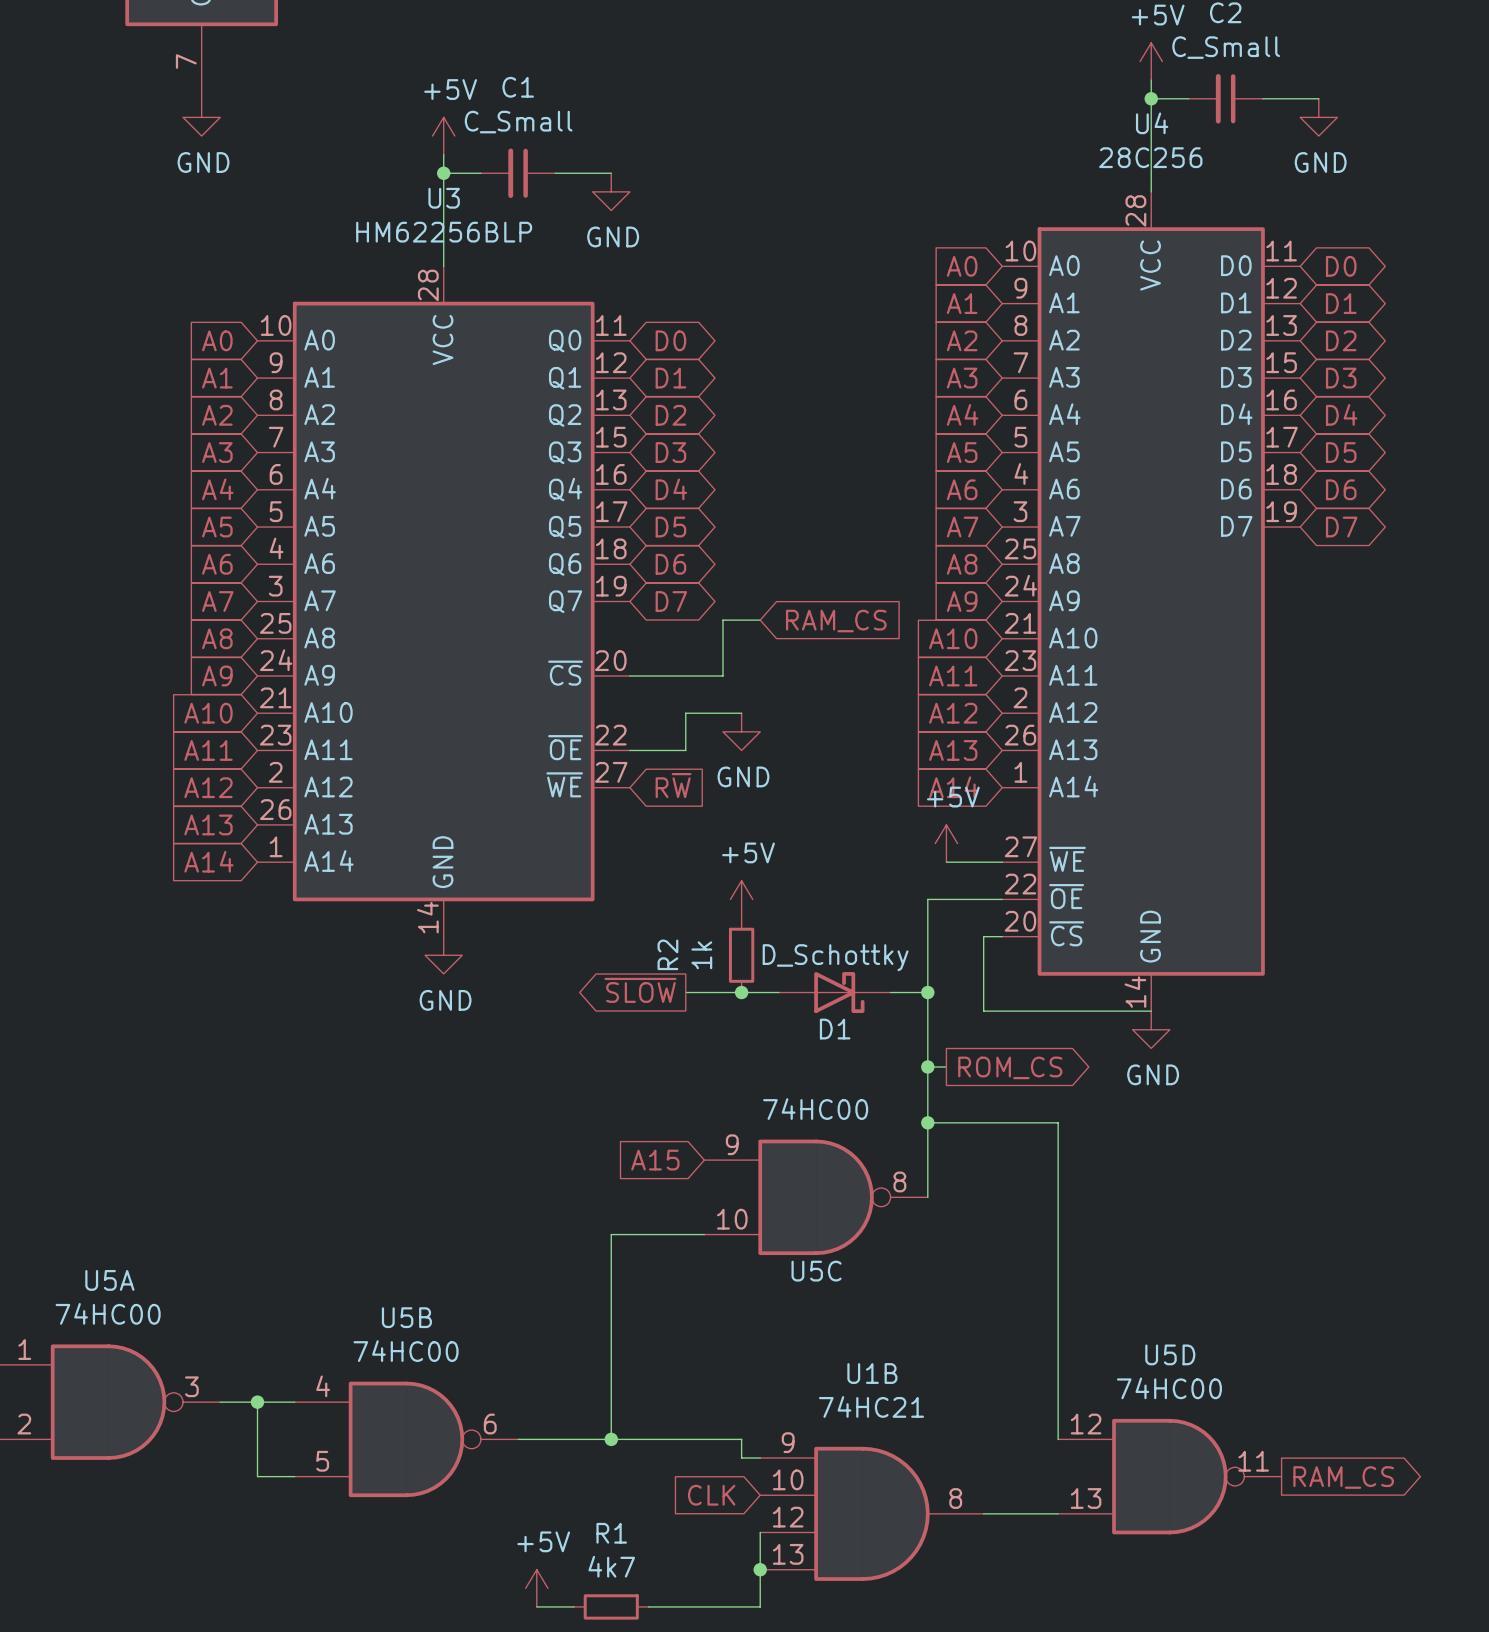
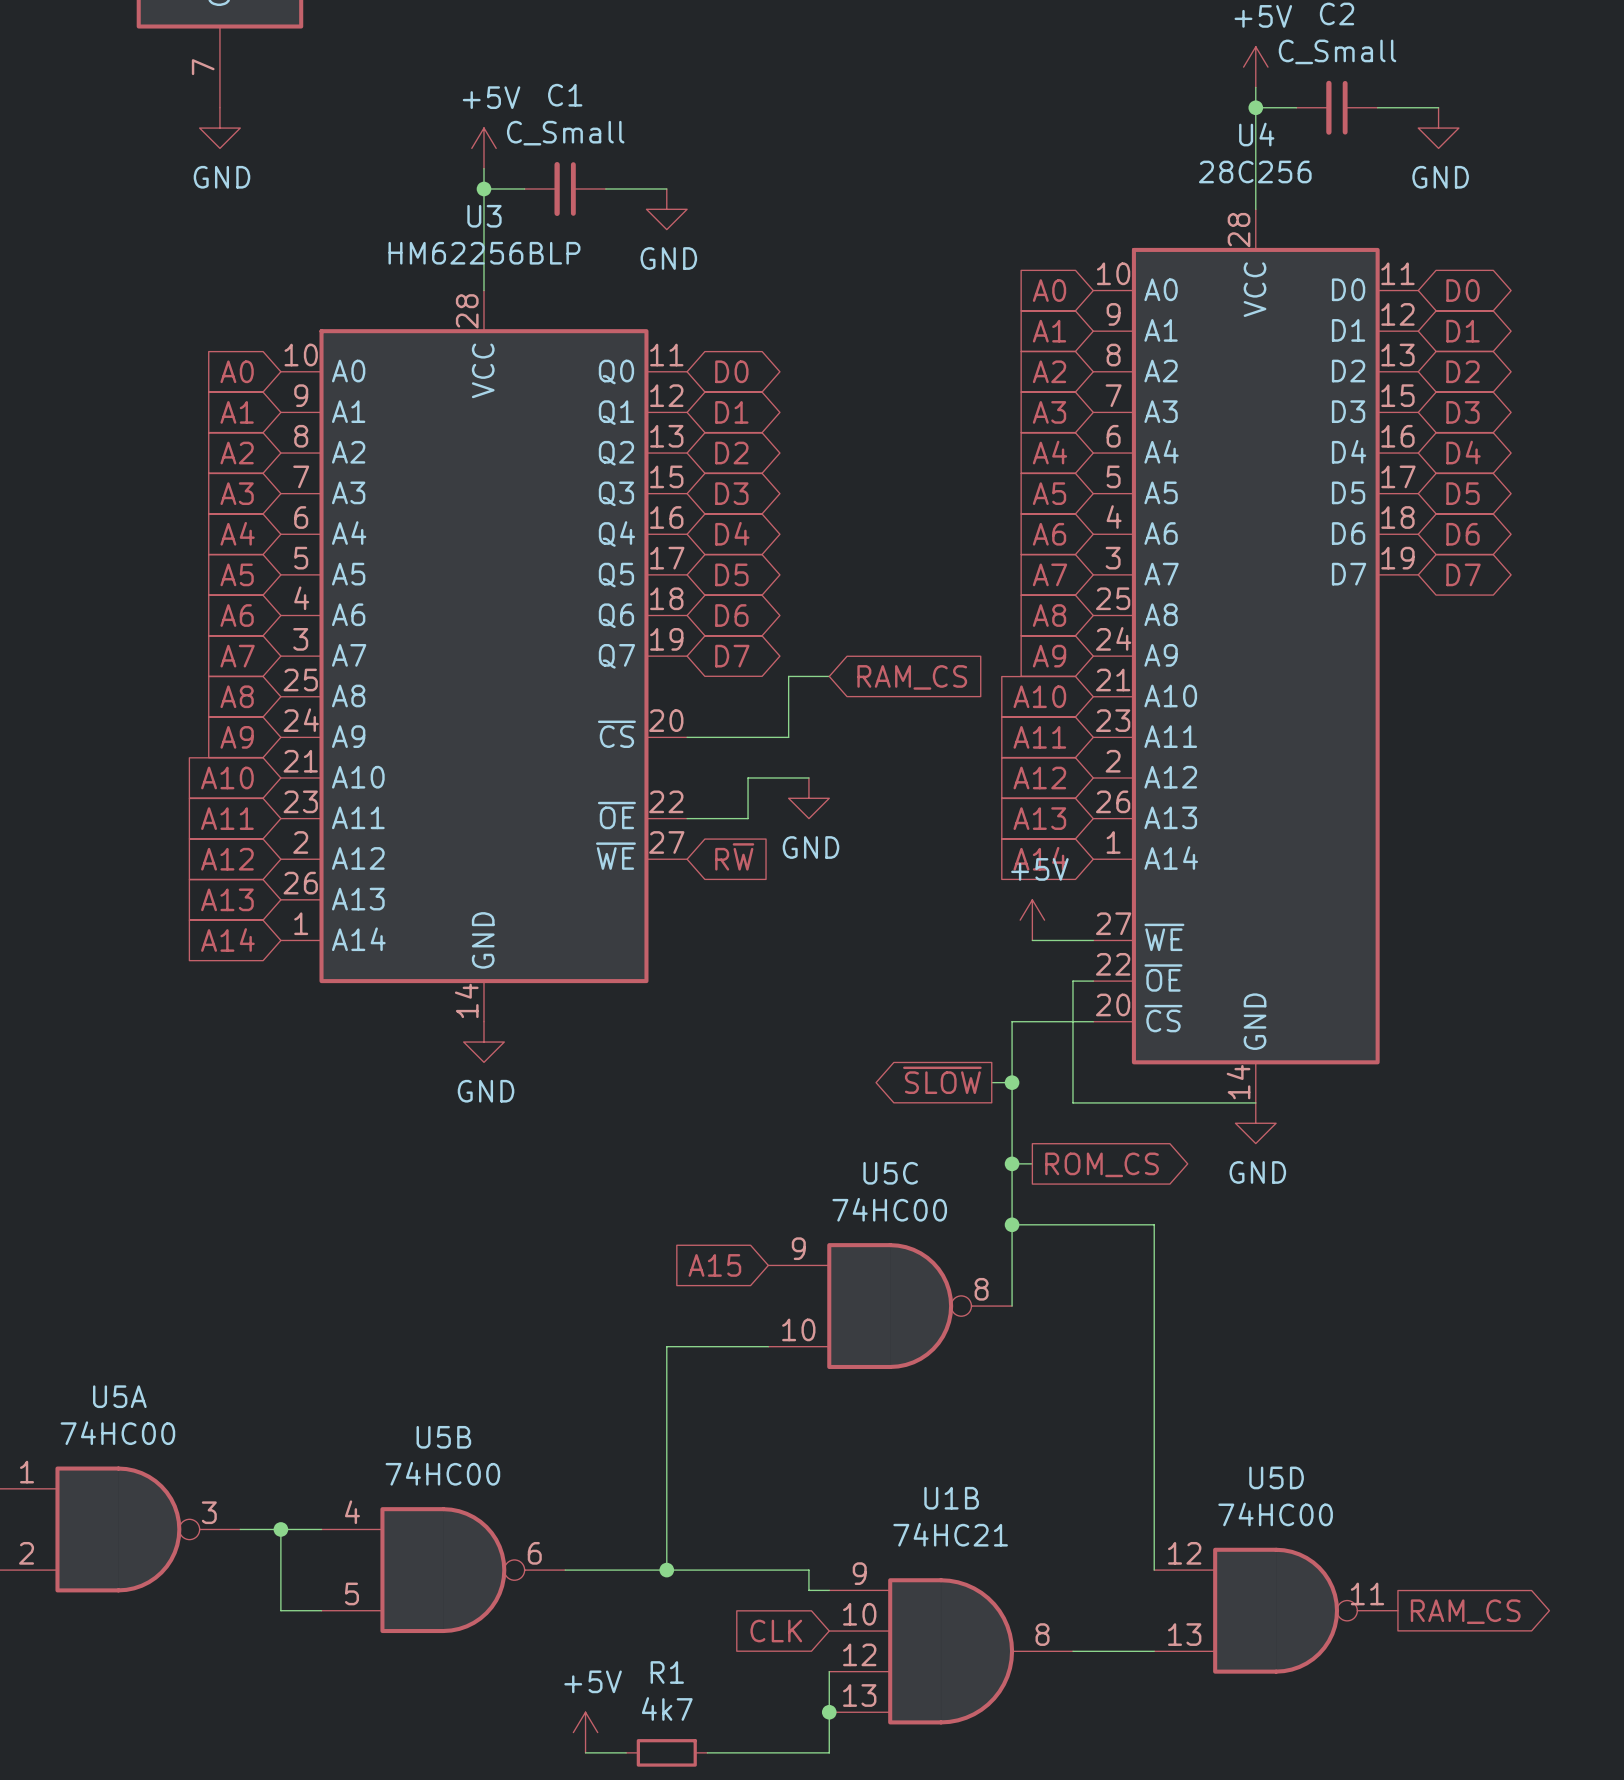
power symbol: +5V (741, 899) -> none
wire: (983, 899) (927, 899) (927, 936) -> (1072, 981) (1072, 1021) (1012, 1021)
R2: 1k (741, 955) -> none
global label position: ~{SLOW} (640, 990) -> ~{SLOW} (942, 1080)
wire: (685, 992) (778, 992) -> none
junction: (741, 992) -> none
D1: D_Schottky (834, 992) -> none
wire: (890, 992) (909, 992) -> none
U5C name position: U5C (816, 1271) -> U5C (890, 1173)

